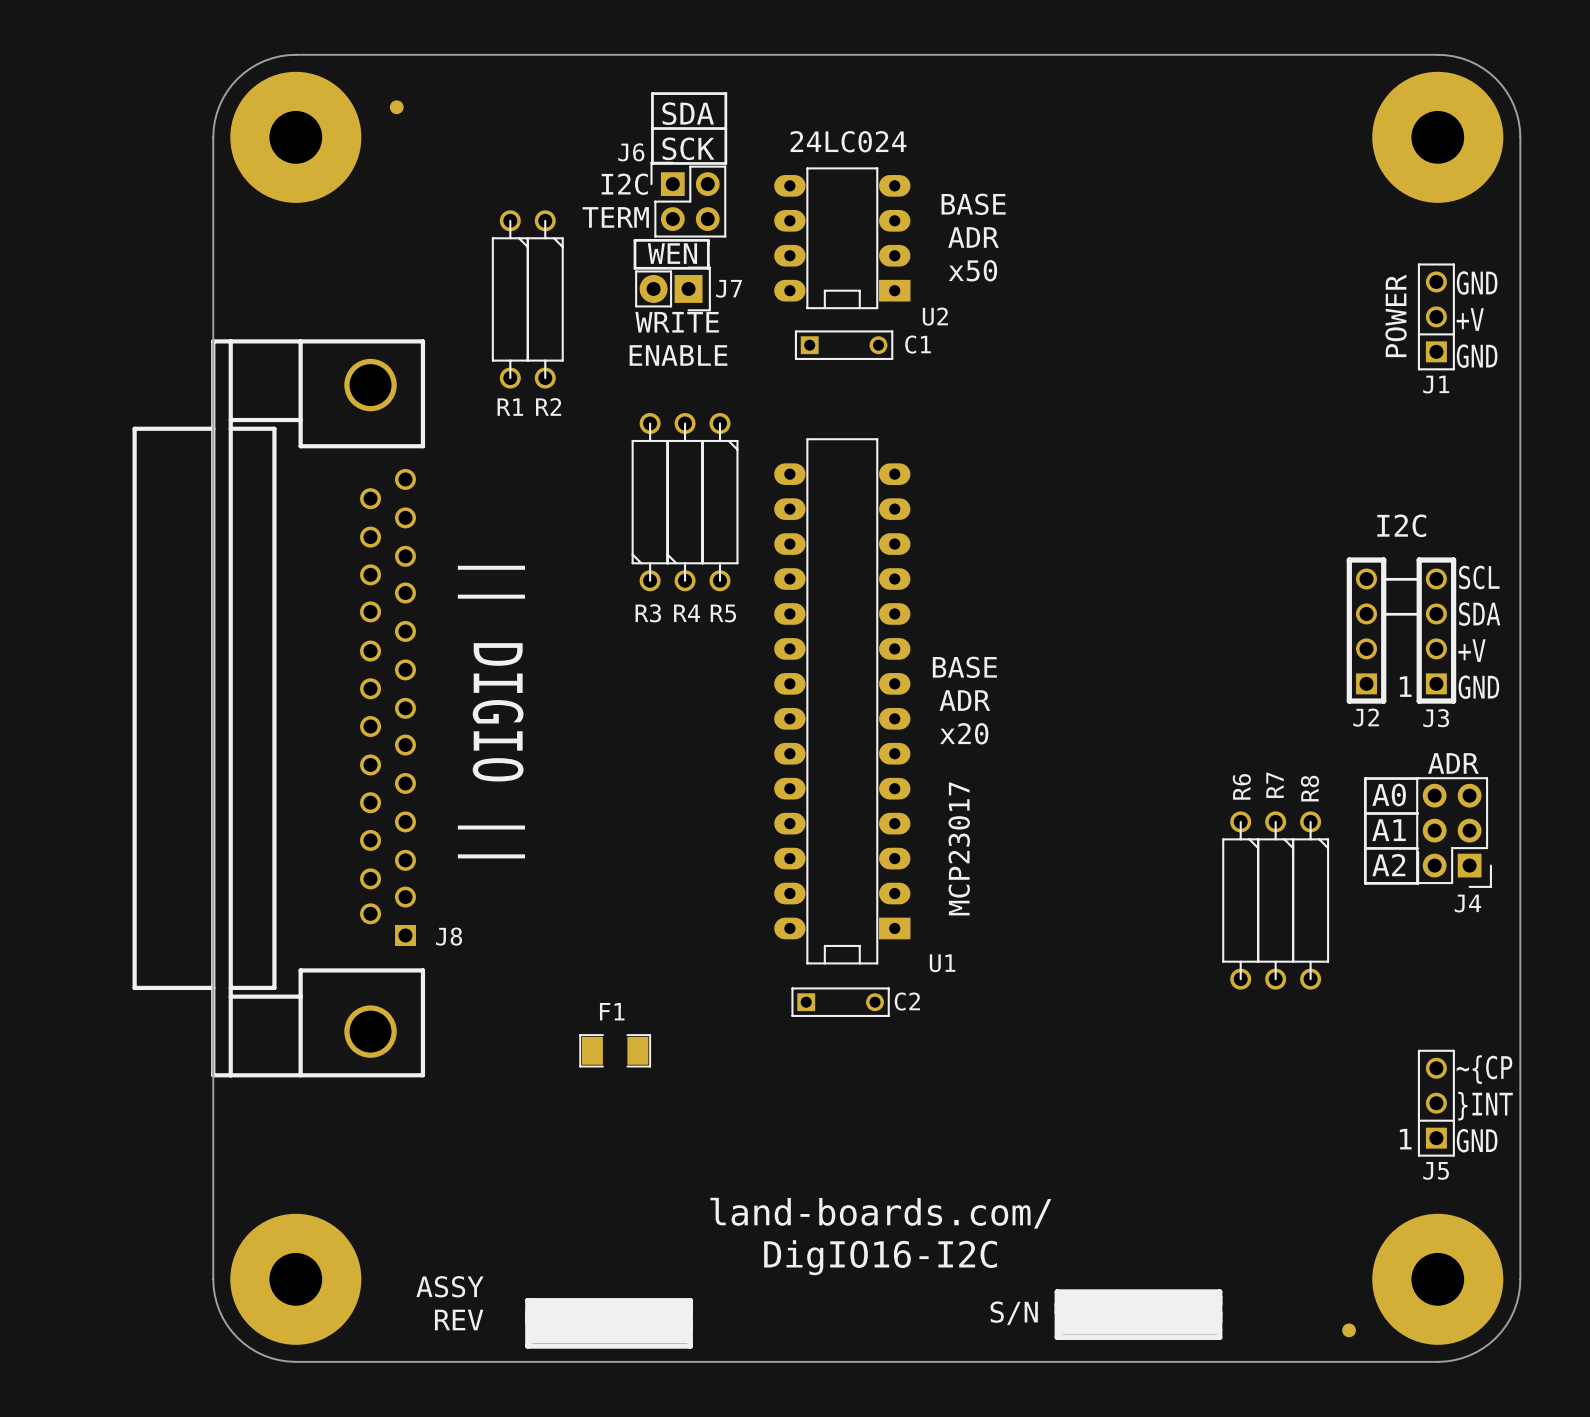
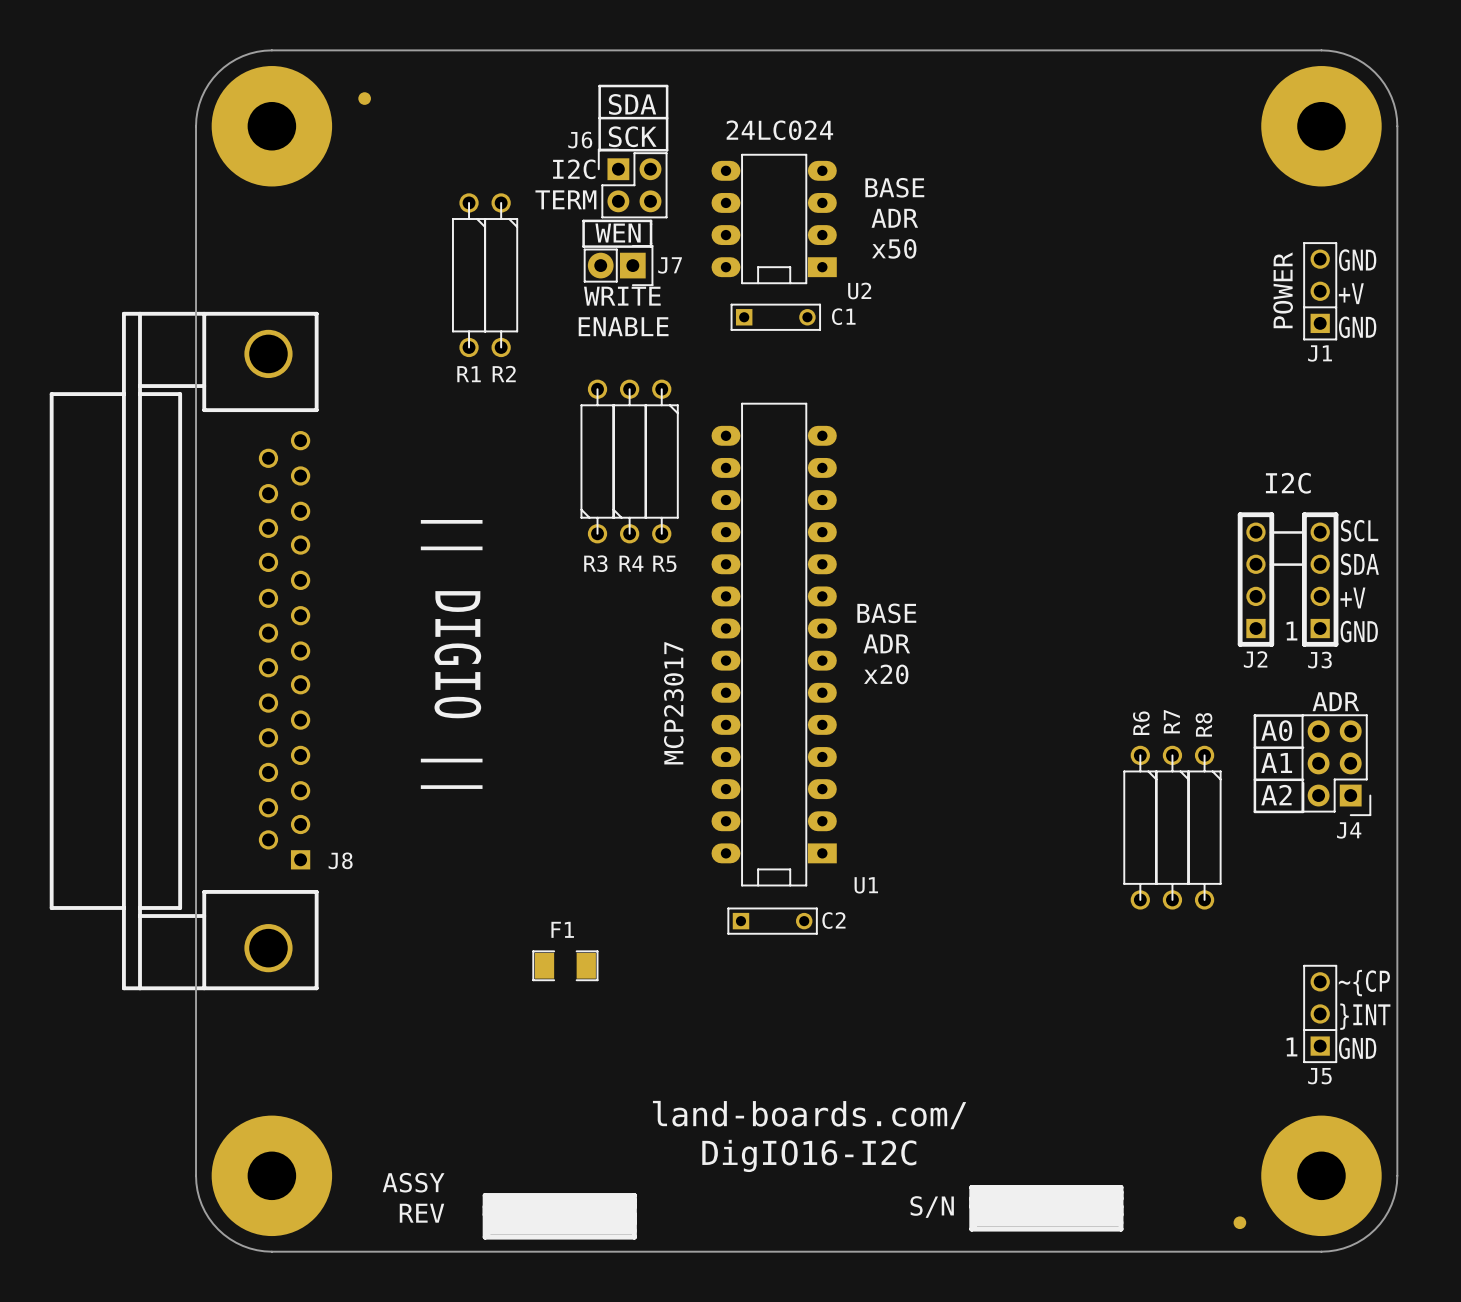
J8 position: (278, 708) -> (184, 651)
text position: MCP23017 (959, 848) -> MCP23017 (673, 703)

